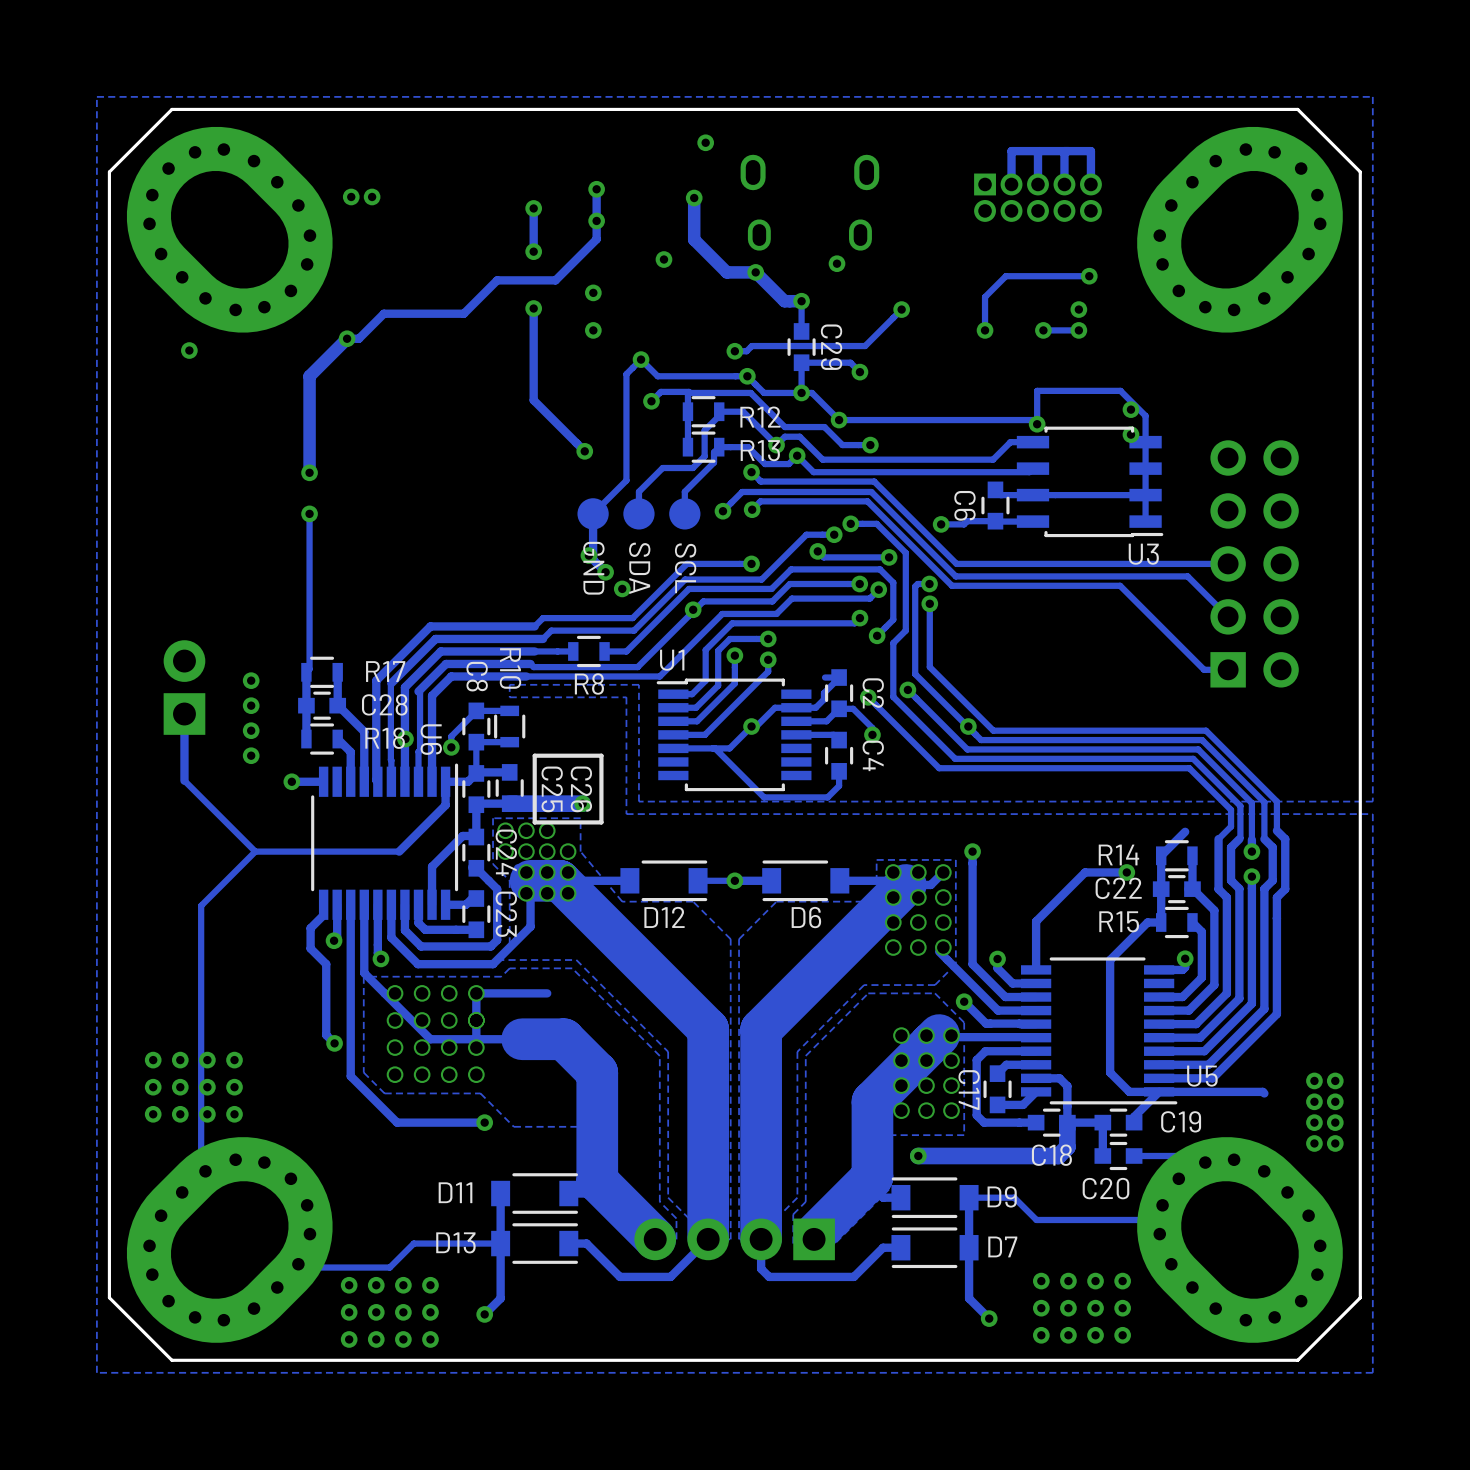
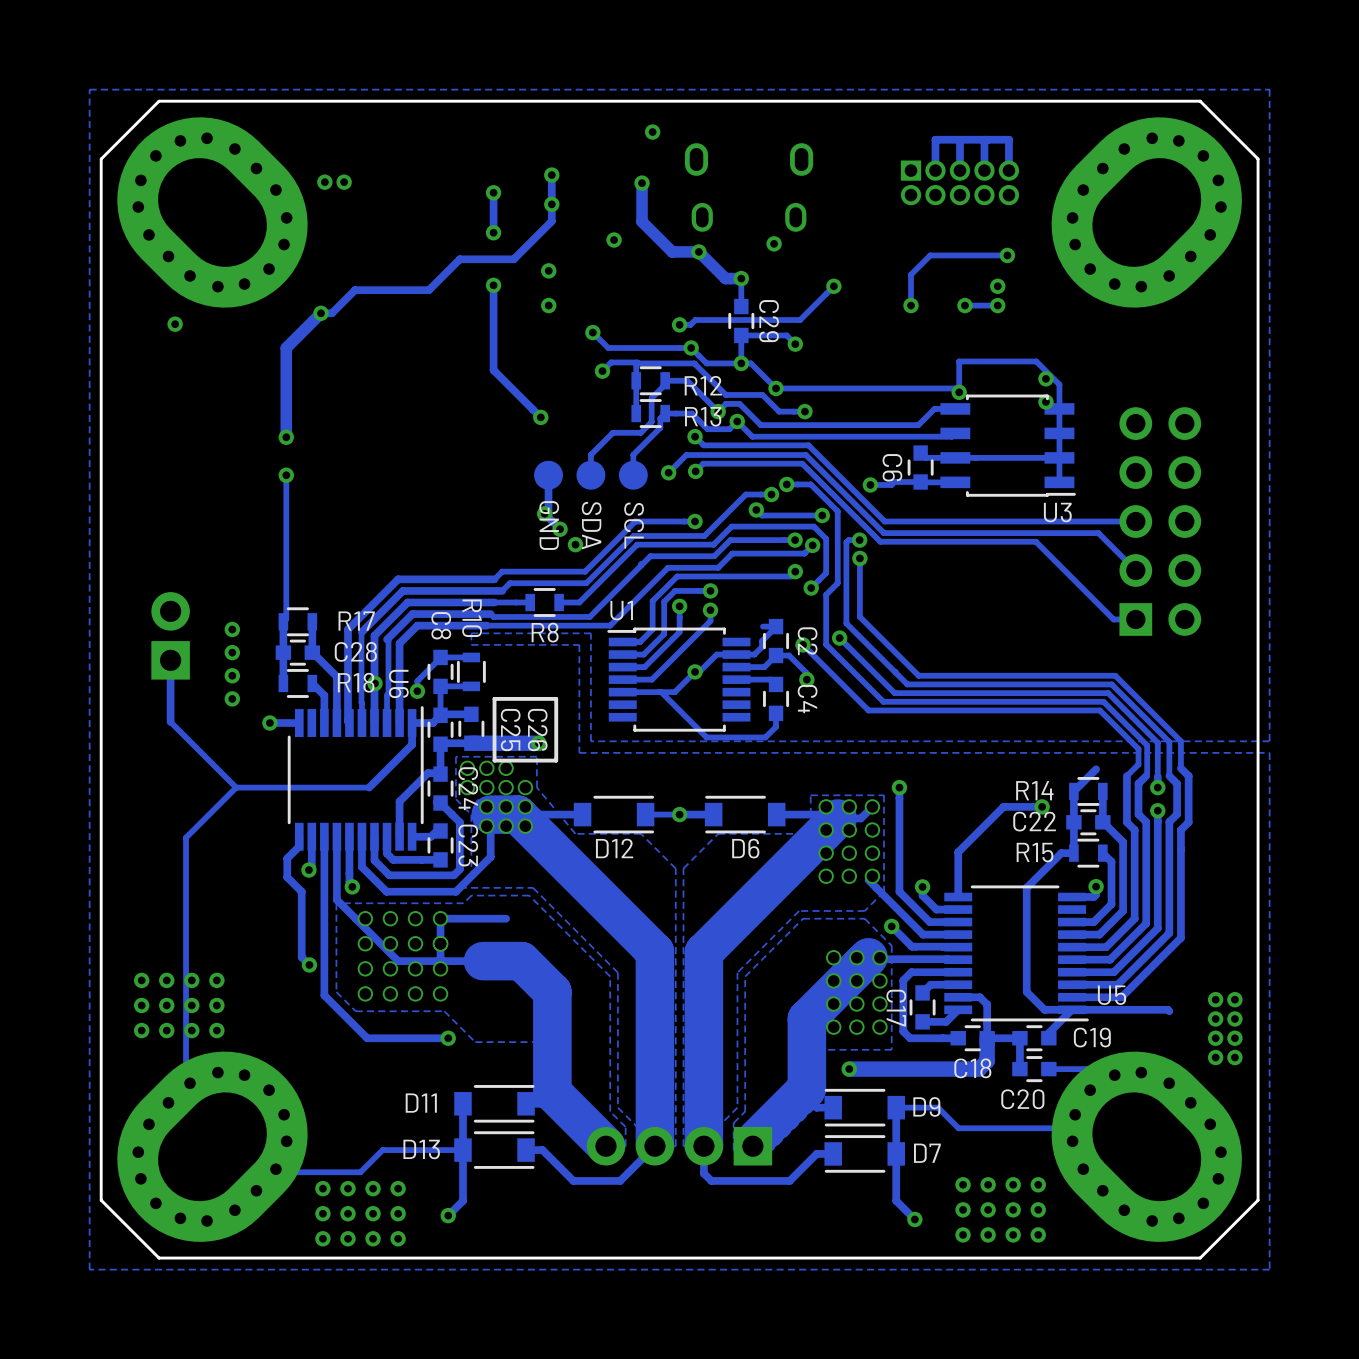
track: (641, 359) (626, 374) (626, 480) (593, 513) -> none
via: (693, 609) -> none
via: (968, 726) -> none

